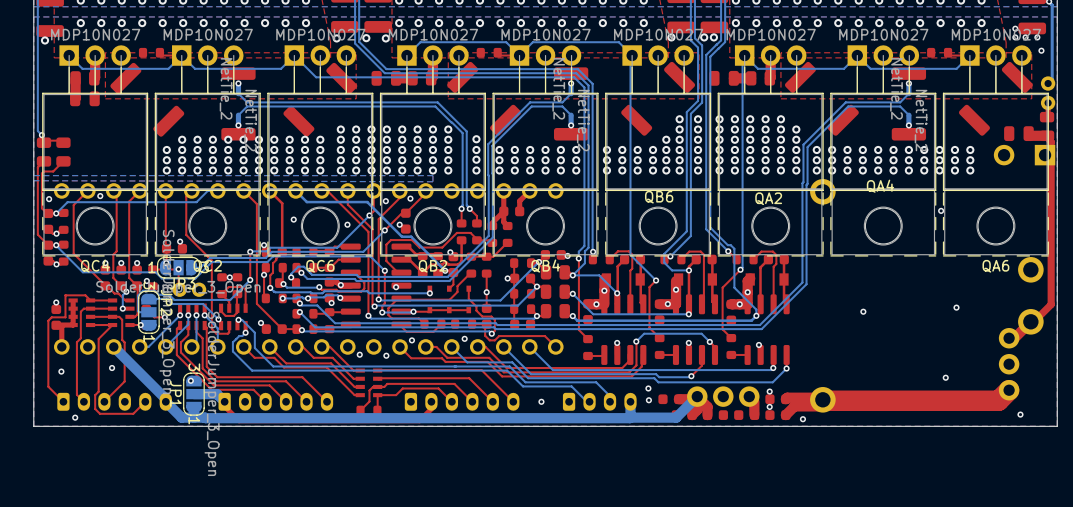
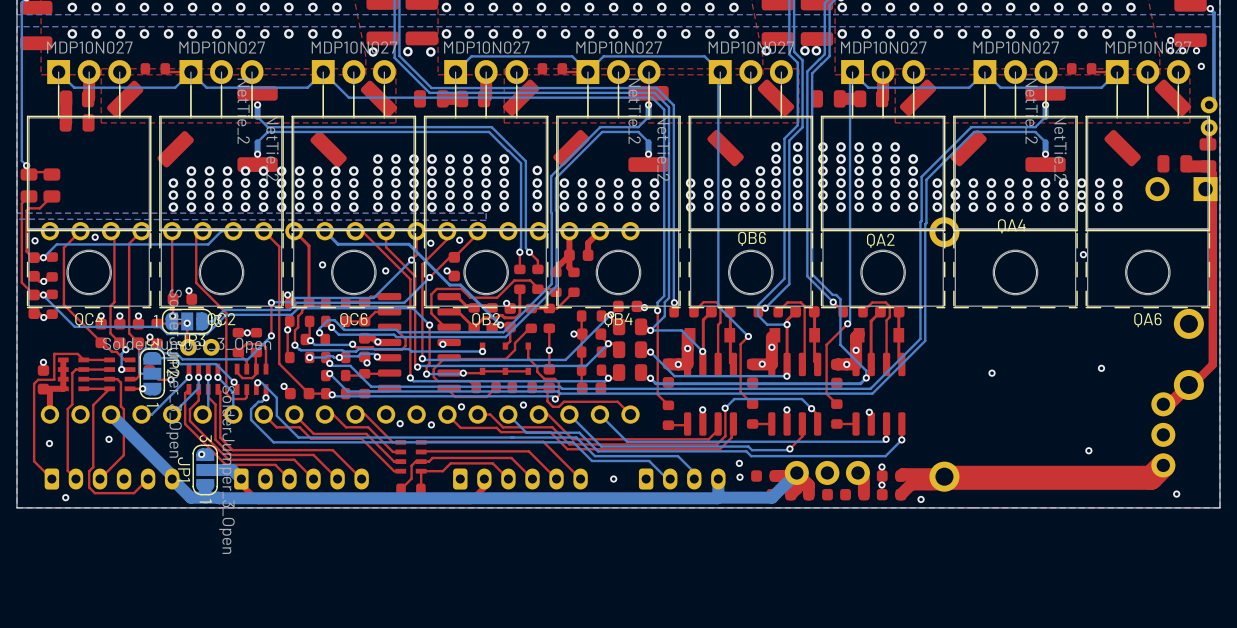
via: (45, 40) -> none

